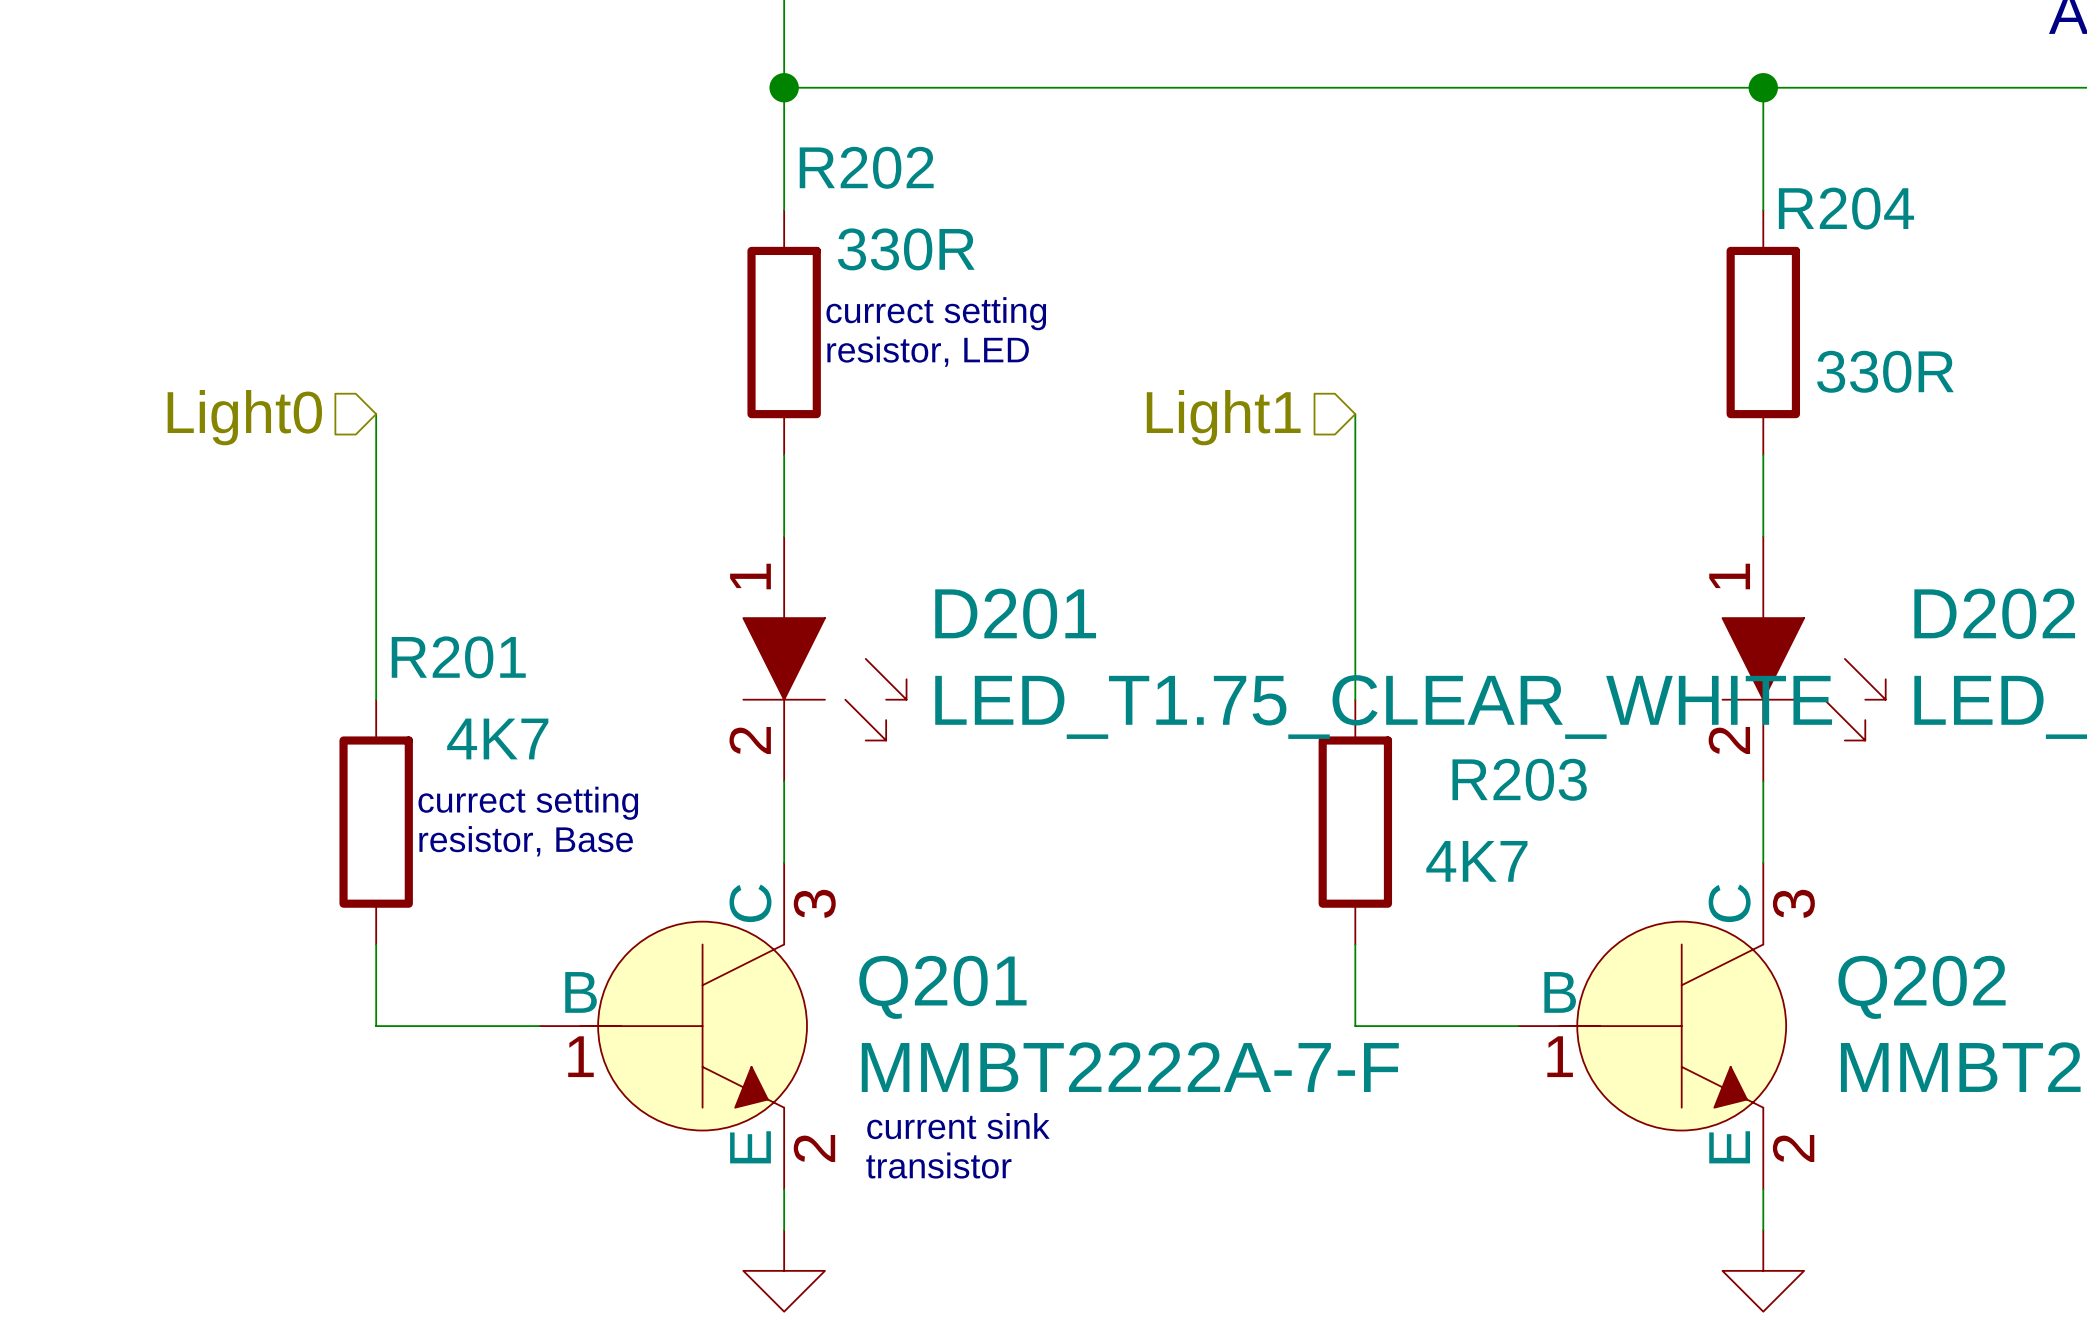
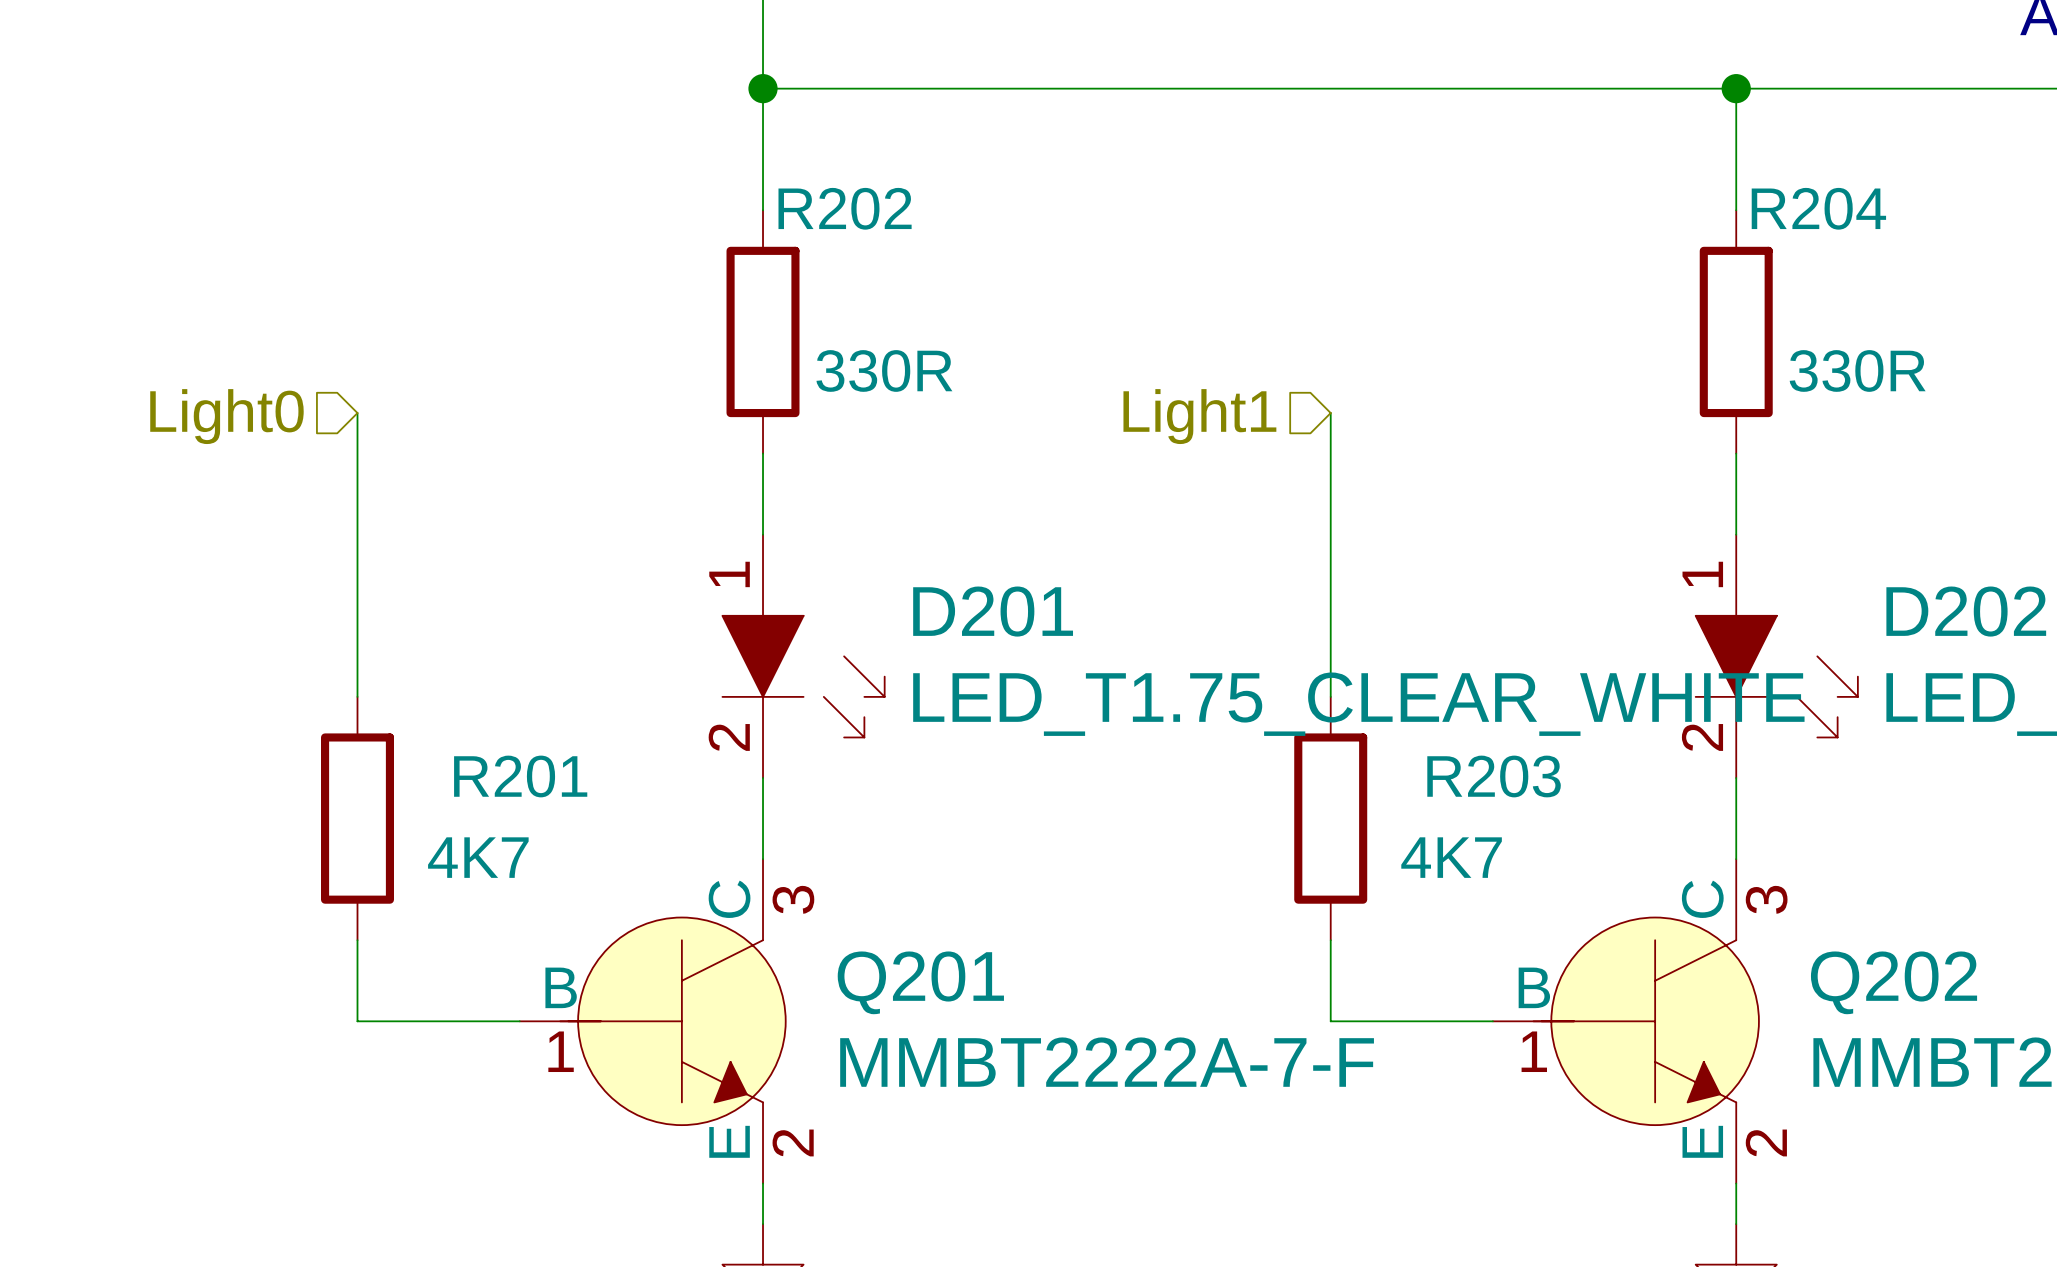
R202 name position: R202 (866, 167) -> R202 (845, 208)
R202 value position: 330R (906, 249) -> 330R (884, 370)
text: currect setting (936, 313) -> none
text: resistor, LED (928, 351) -> none
R201 name position: R201 (458, 657) -> R201 (520, 776)
R201 value position: 4K7 (497, 738) -> 4K7 (478, 857)
text: currect setting (528, 803) -> none
text: resistor, Base (526, 841) -> none
text: current sink (958, 1126) -> none
text: transistor (938, 1165) -> none

